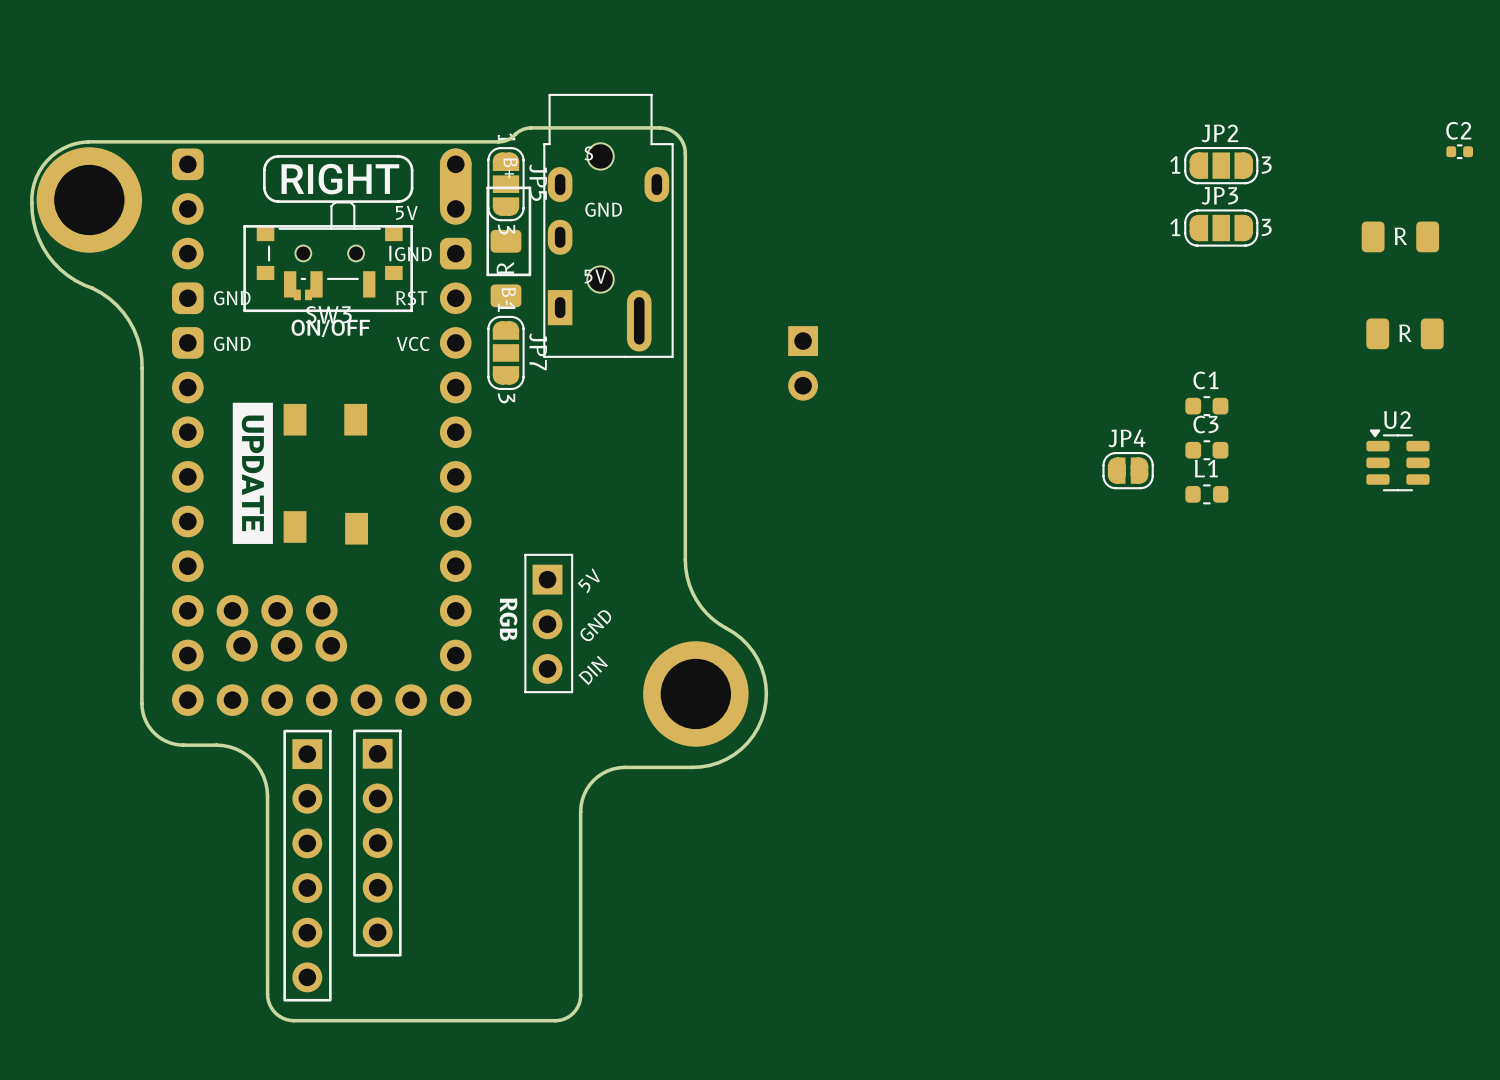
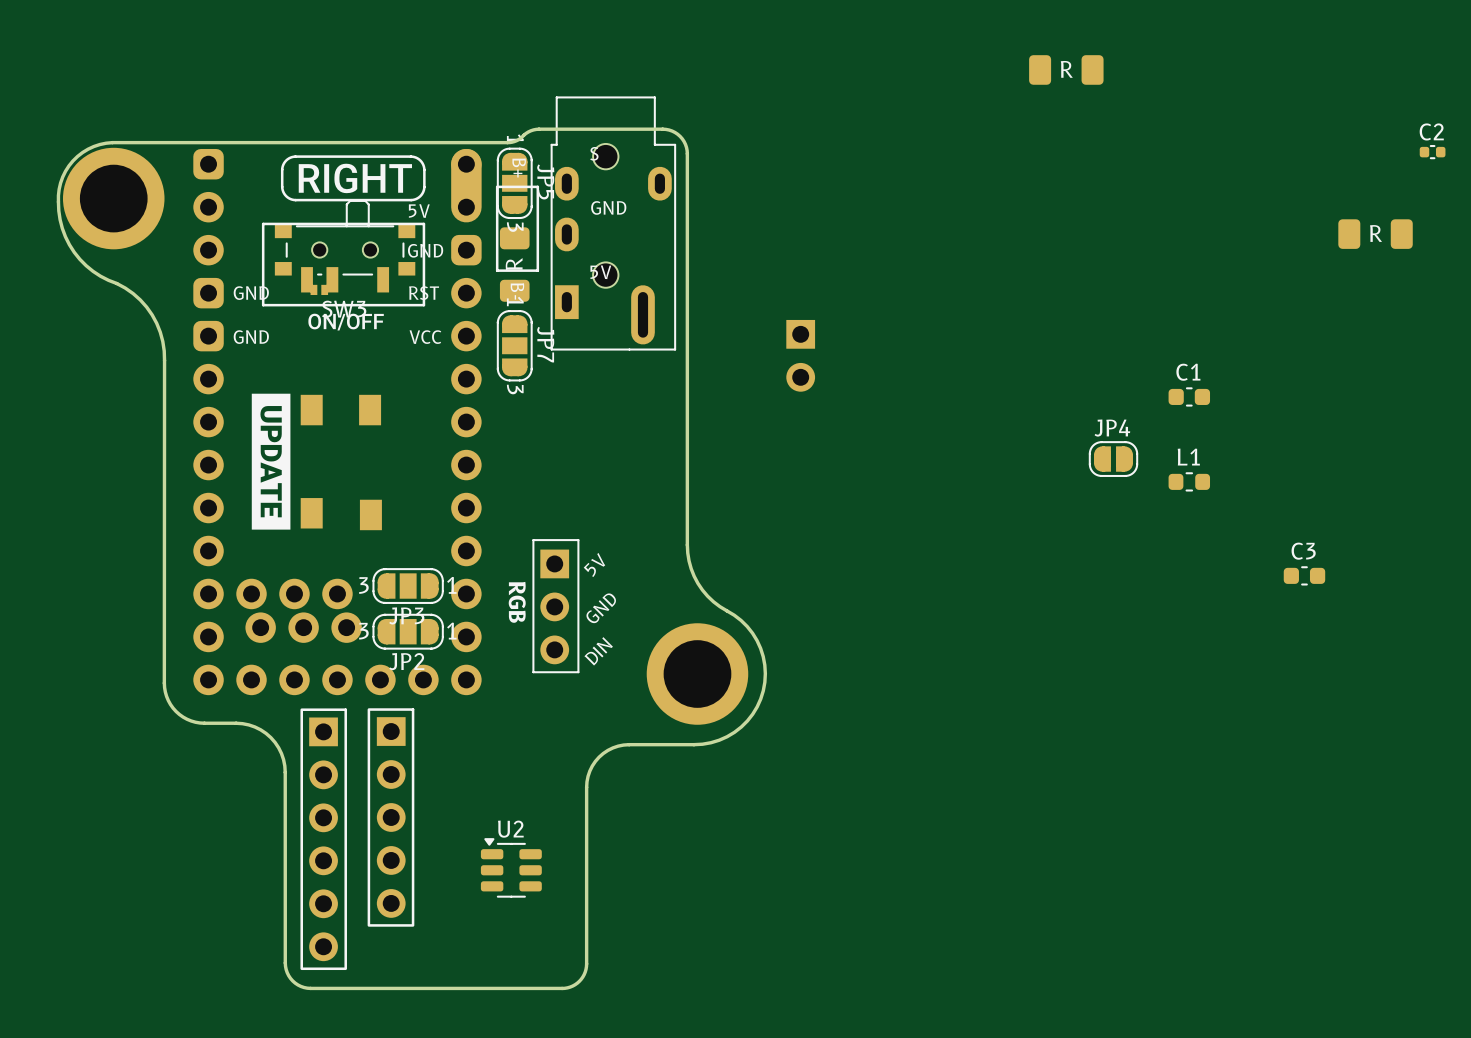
JP2 rotation: 0° (1221, 165) -> 180° (408, 631)
JP2 position: (1221, 165) -> (408, 631)
JP3 rotation: 0° (1221, 228) -> 180° (408, 586)
JP3 position: (1221, 228) -> (408, 586)
part position: (1404, 333) -> (1066, 69)
C3 position: (1206, 450) -> (1304, 575)
U2 position: (1397, 460) -> (511, 867)

